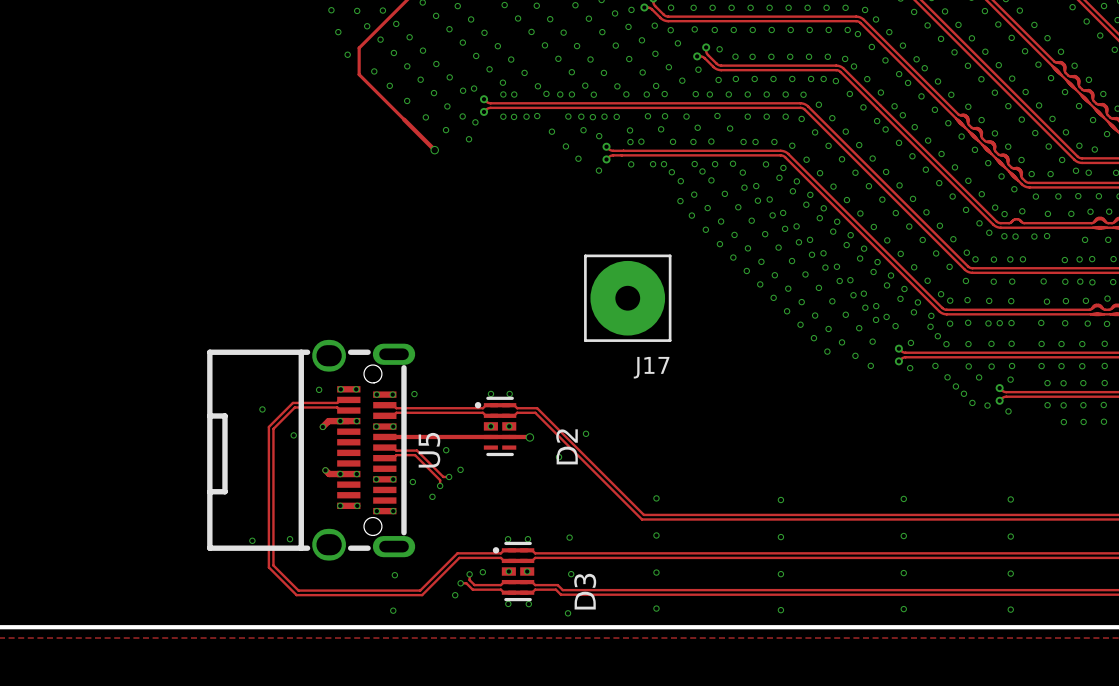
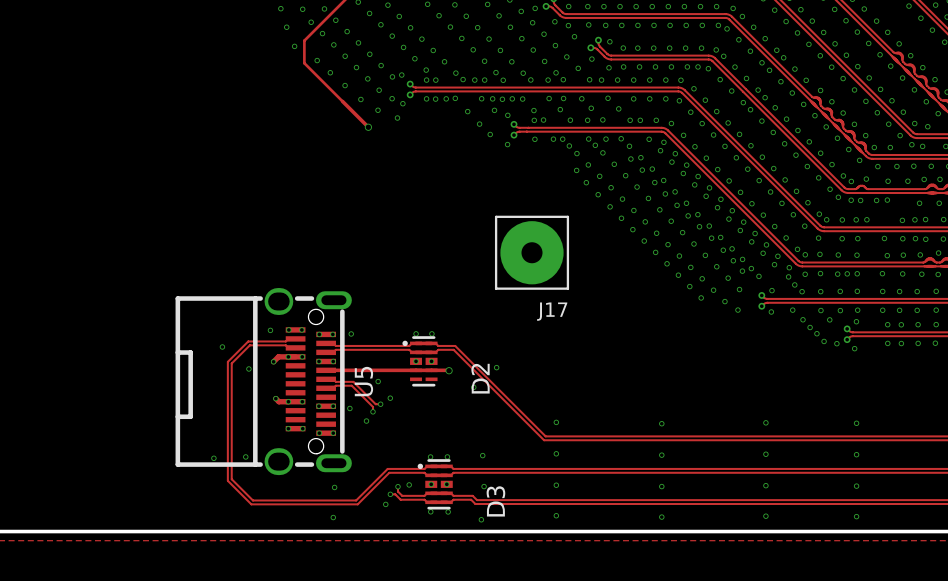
via: (1083, 421) -> none
via: (1103, 421) -> none
via: (1063, 422) -> none

